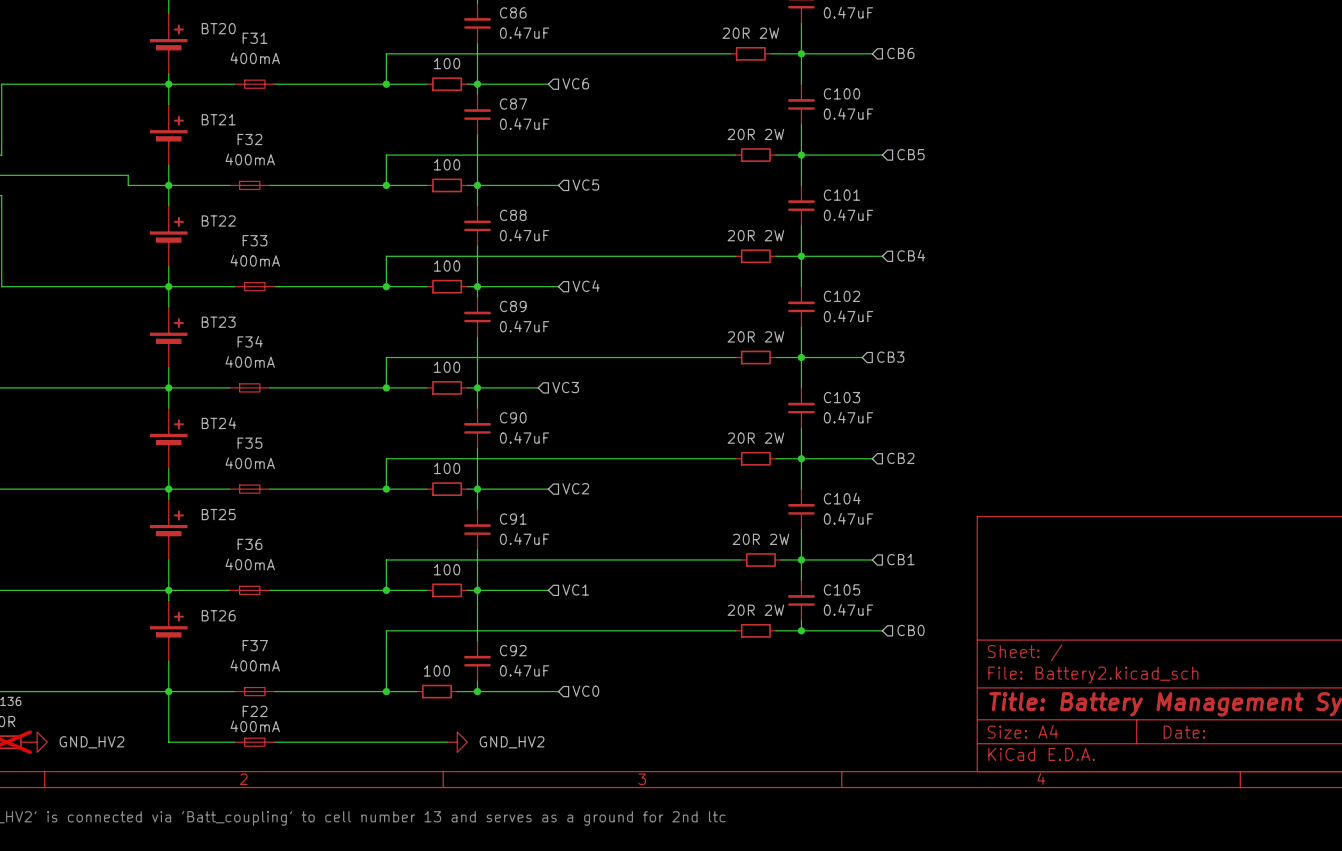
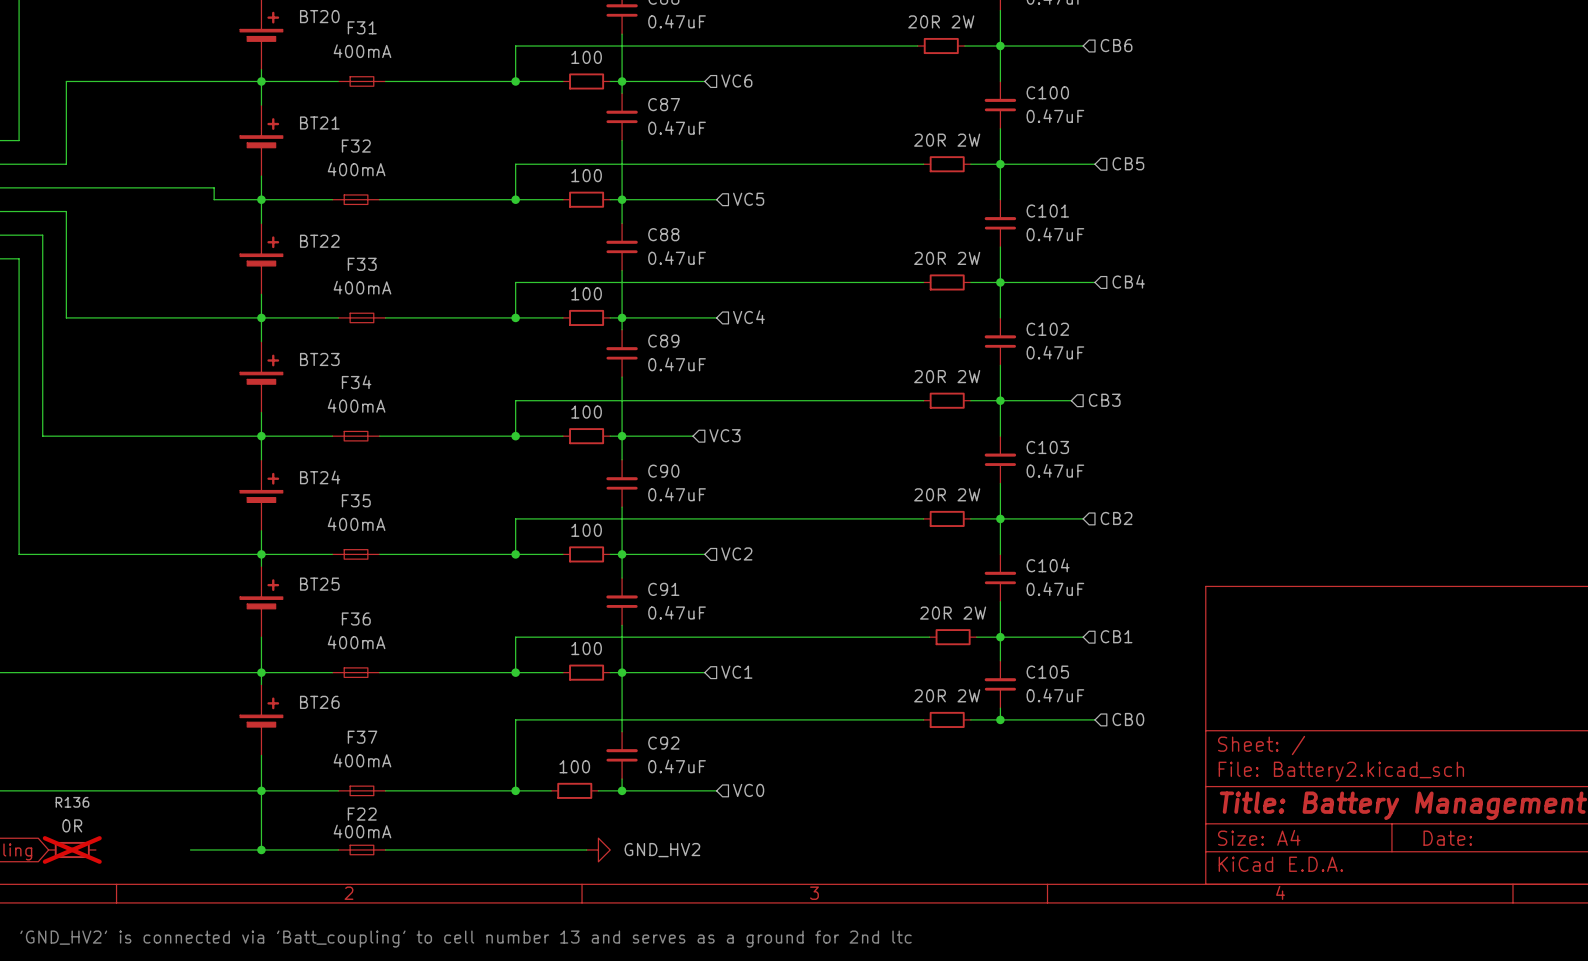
power symbol: GND_HV2 (37, 742) -> none
wire: none -> (190, 849) (261, 849)
junction: none -> (261, 849)

